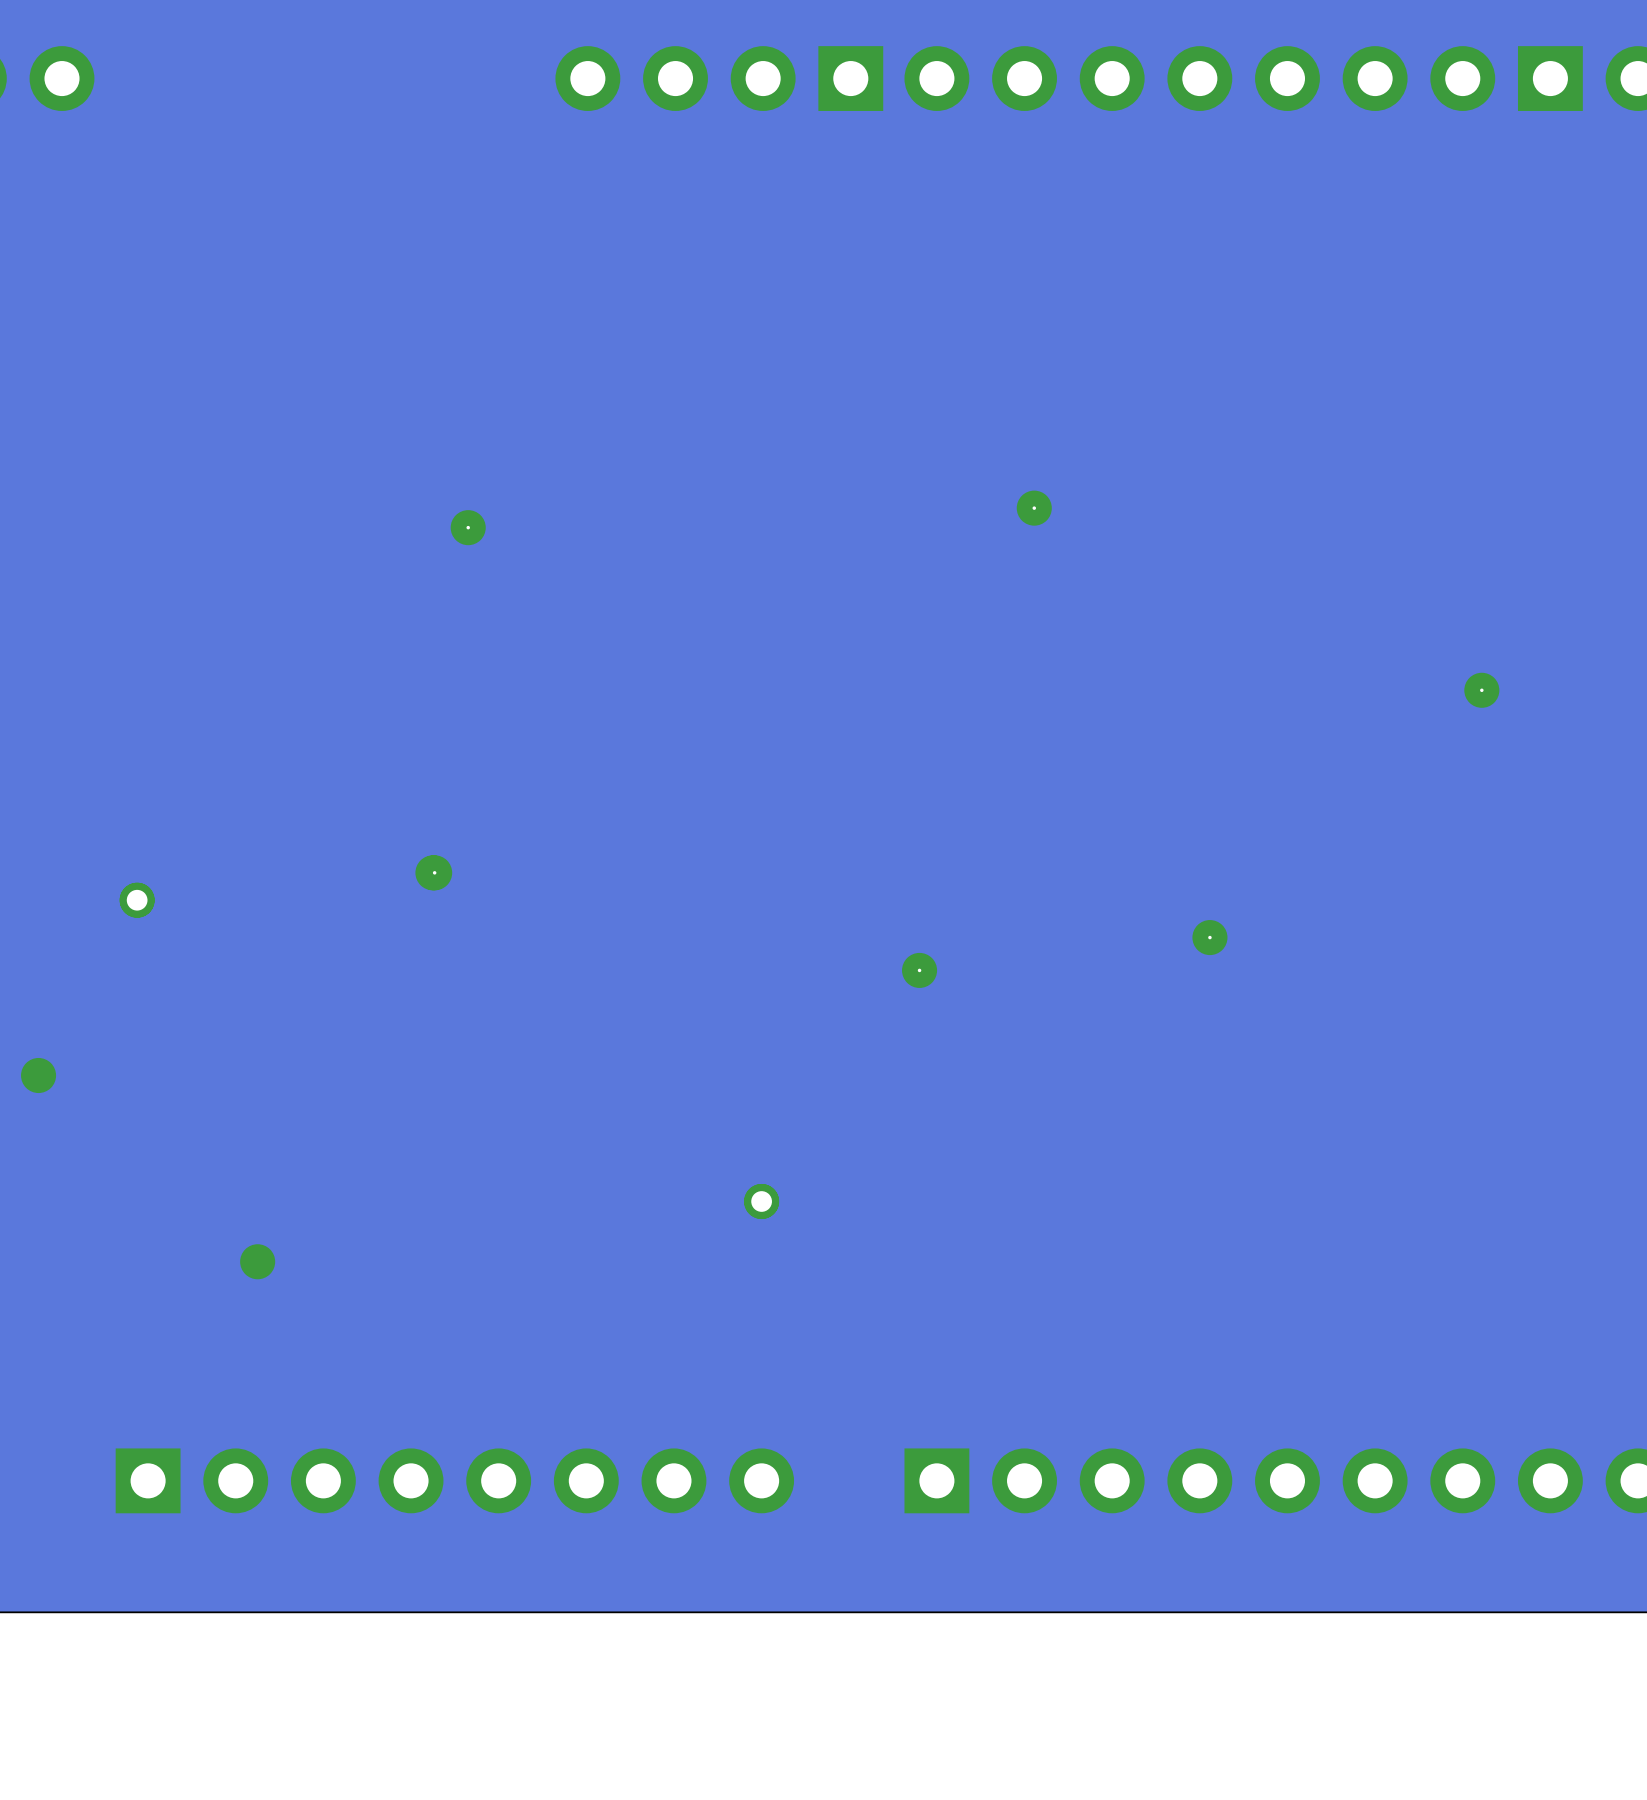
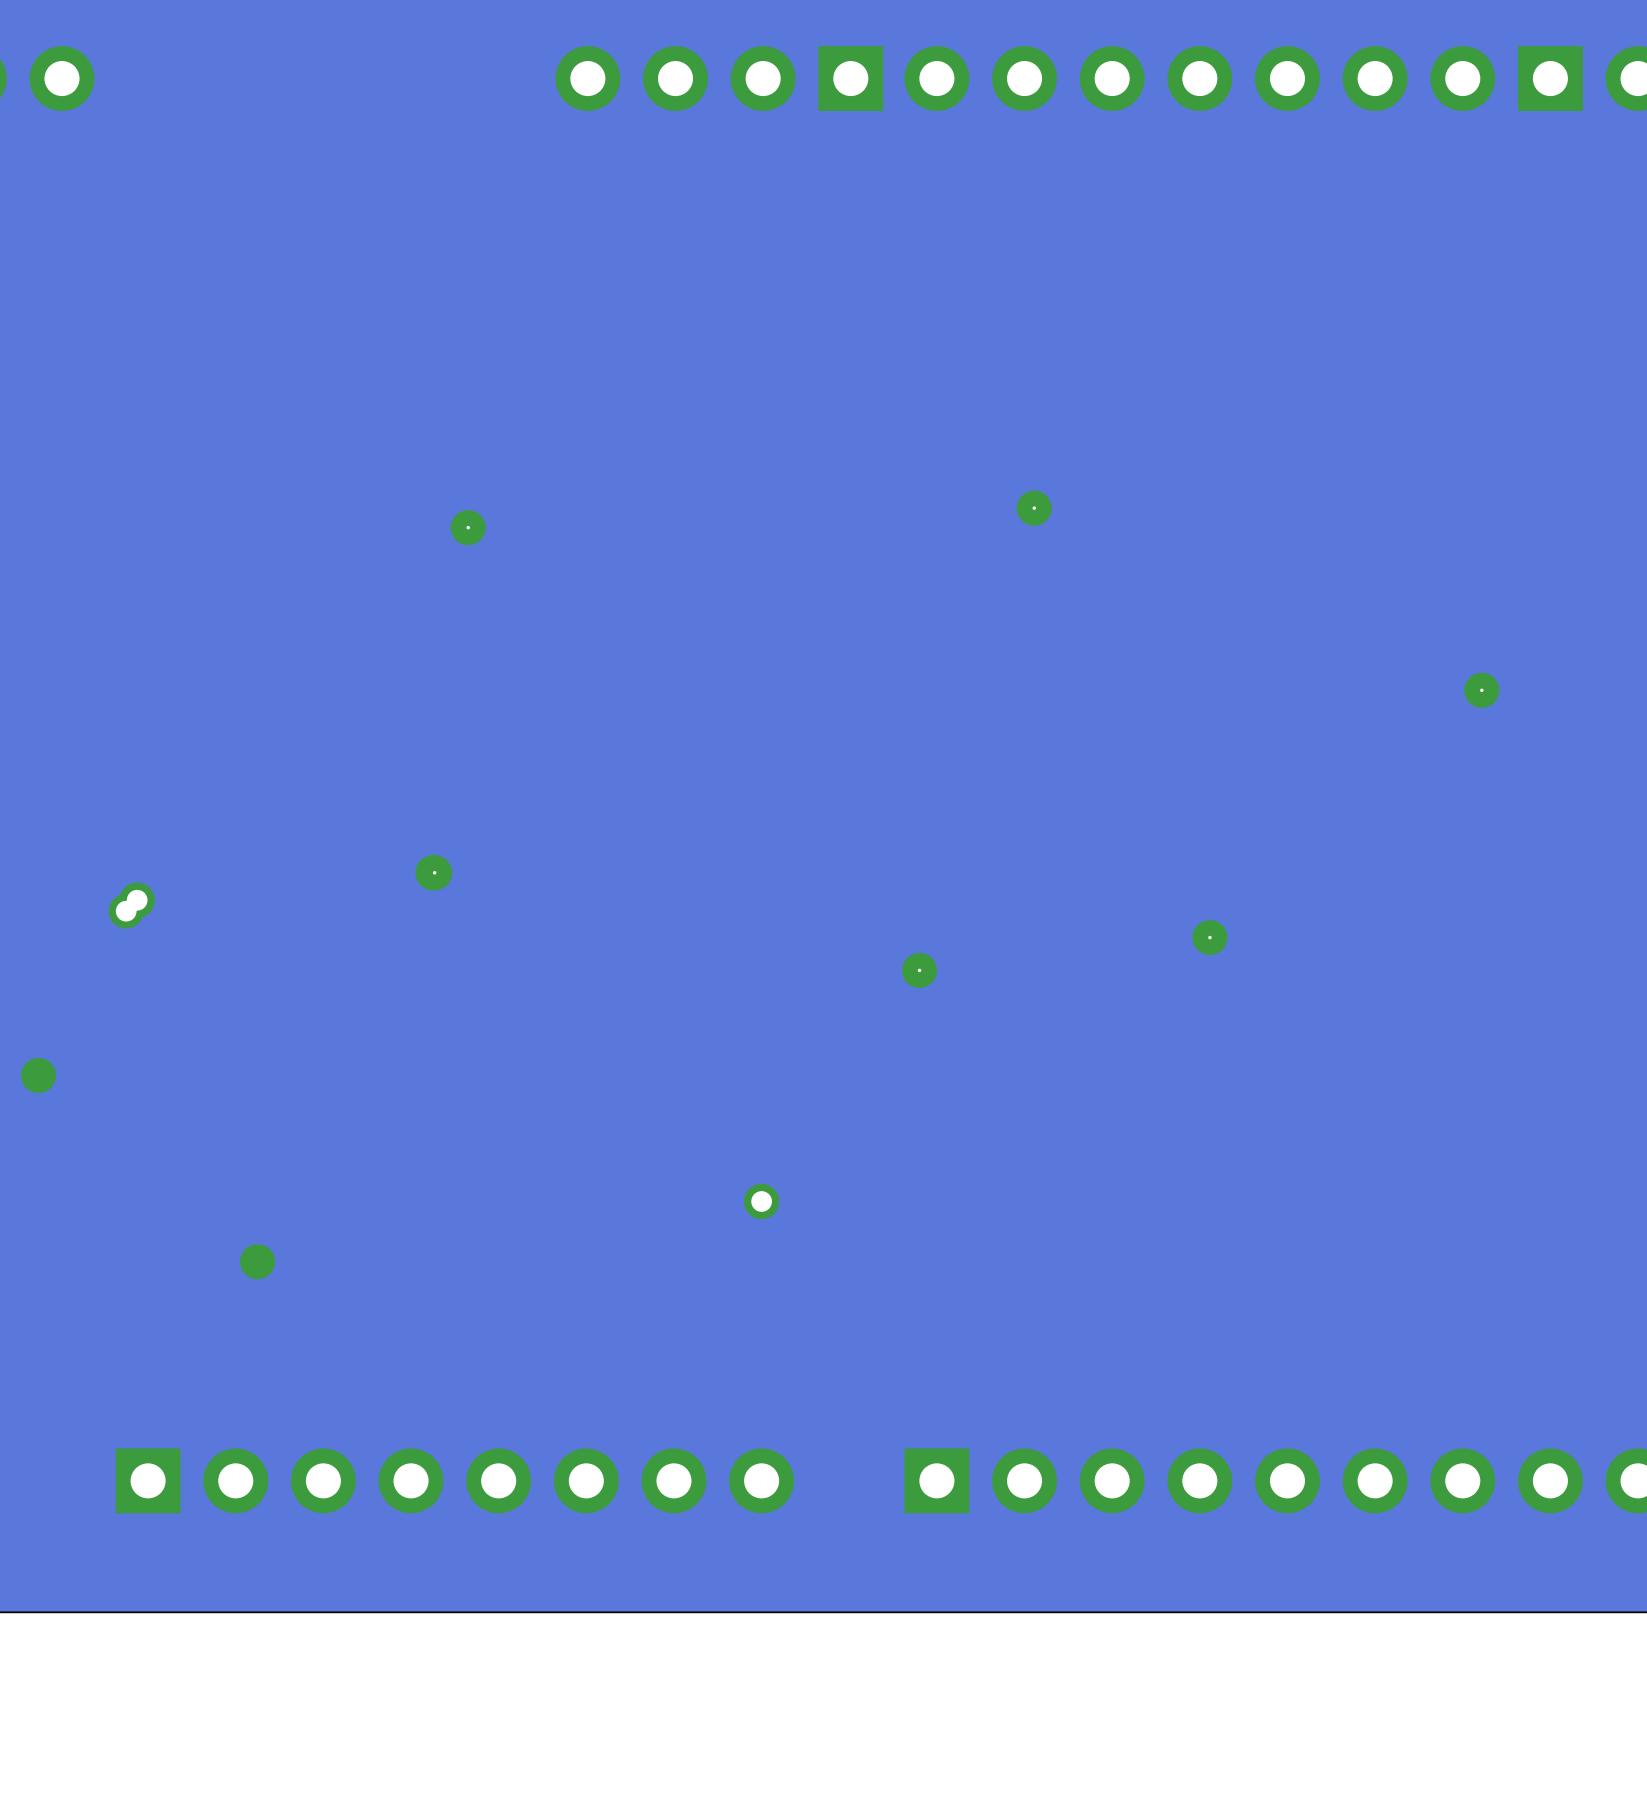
via: none -> (126, 911)

